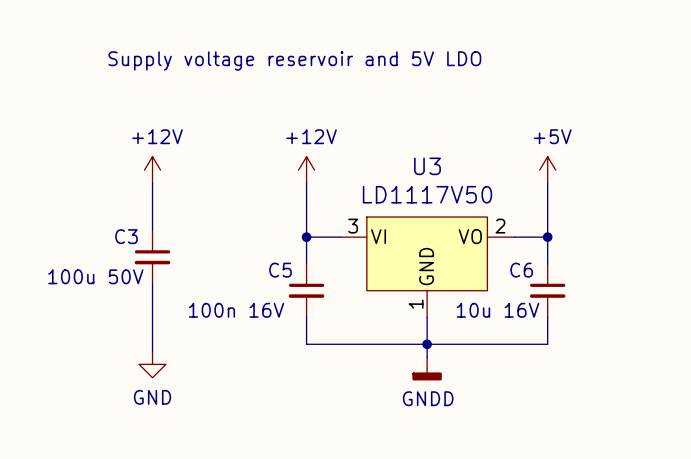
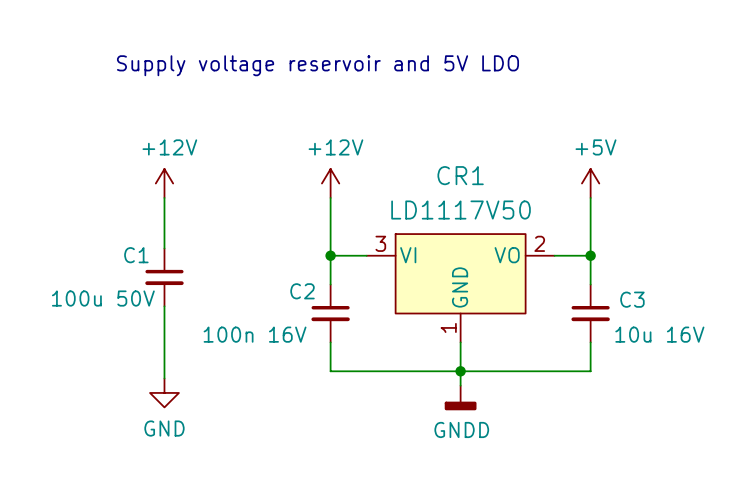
U3 name: U3 (427, 166) -> CR1 (460, 175)
C3 name: C3 (126, 236) -> C1 (136, 255)
C5 name: C5 (280, 270) -> C2 (302, 291)
C6 name: C6 (521, 270) -> C3 (632, 299)
C6 value position: 10u 16V (498, 310) -> 10u 16V (659, 334)

